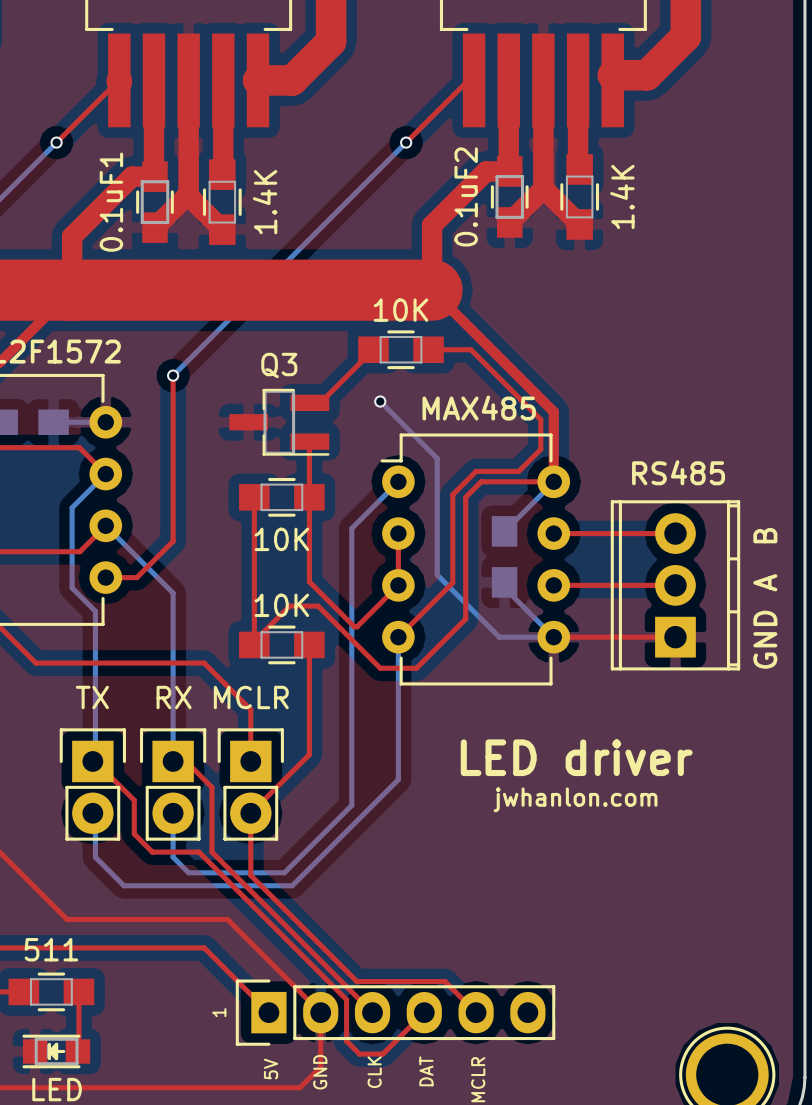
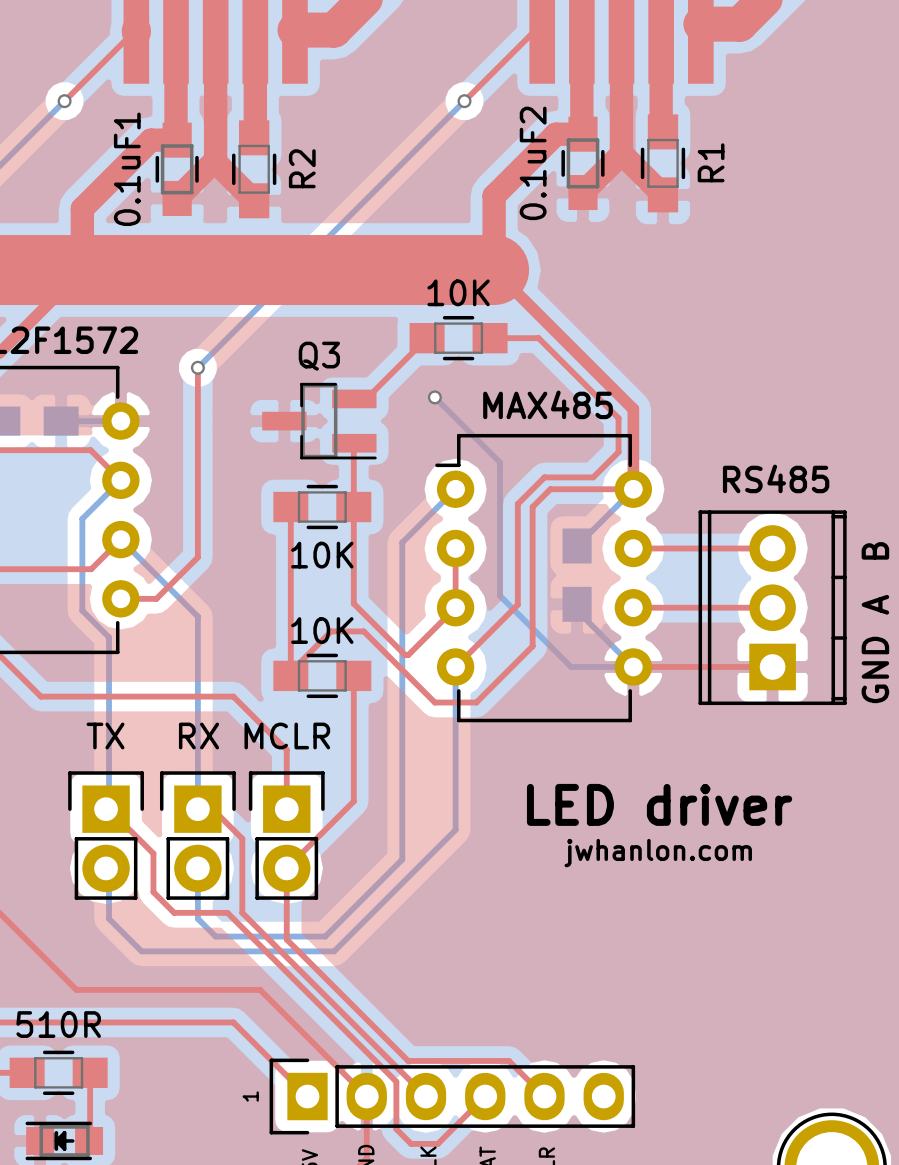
R1 name: none -> R1 (711, 162)
R1 value: 1.4K (622, 196) -> none
R2 name: none -> R2 (302, 168)
R2 value: 1.4K (265, 202) -> none
part value: 511 (51, 949) -> 510R (58, 1024)

